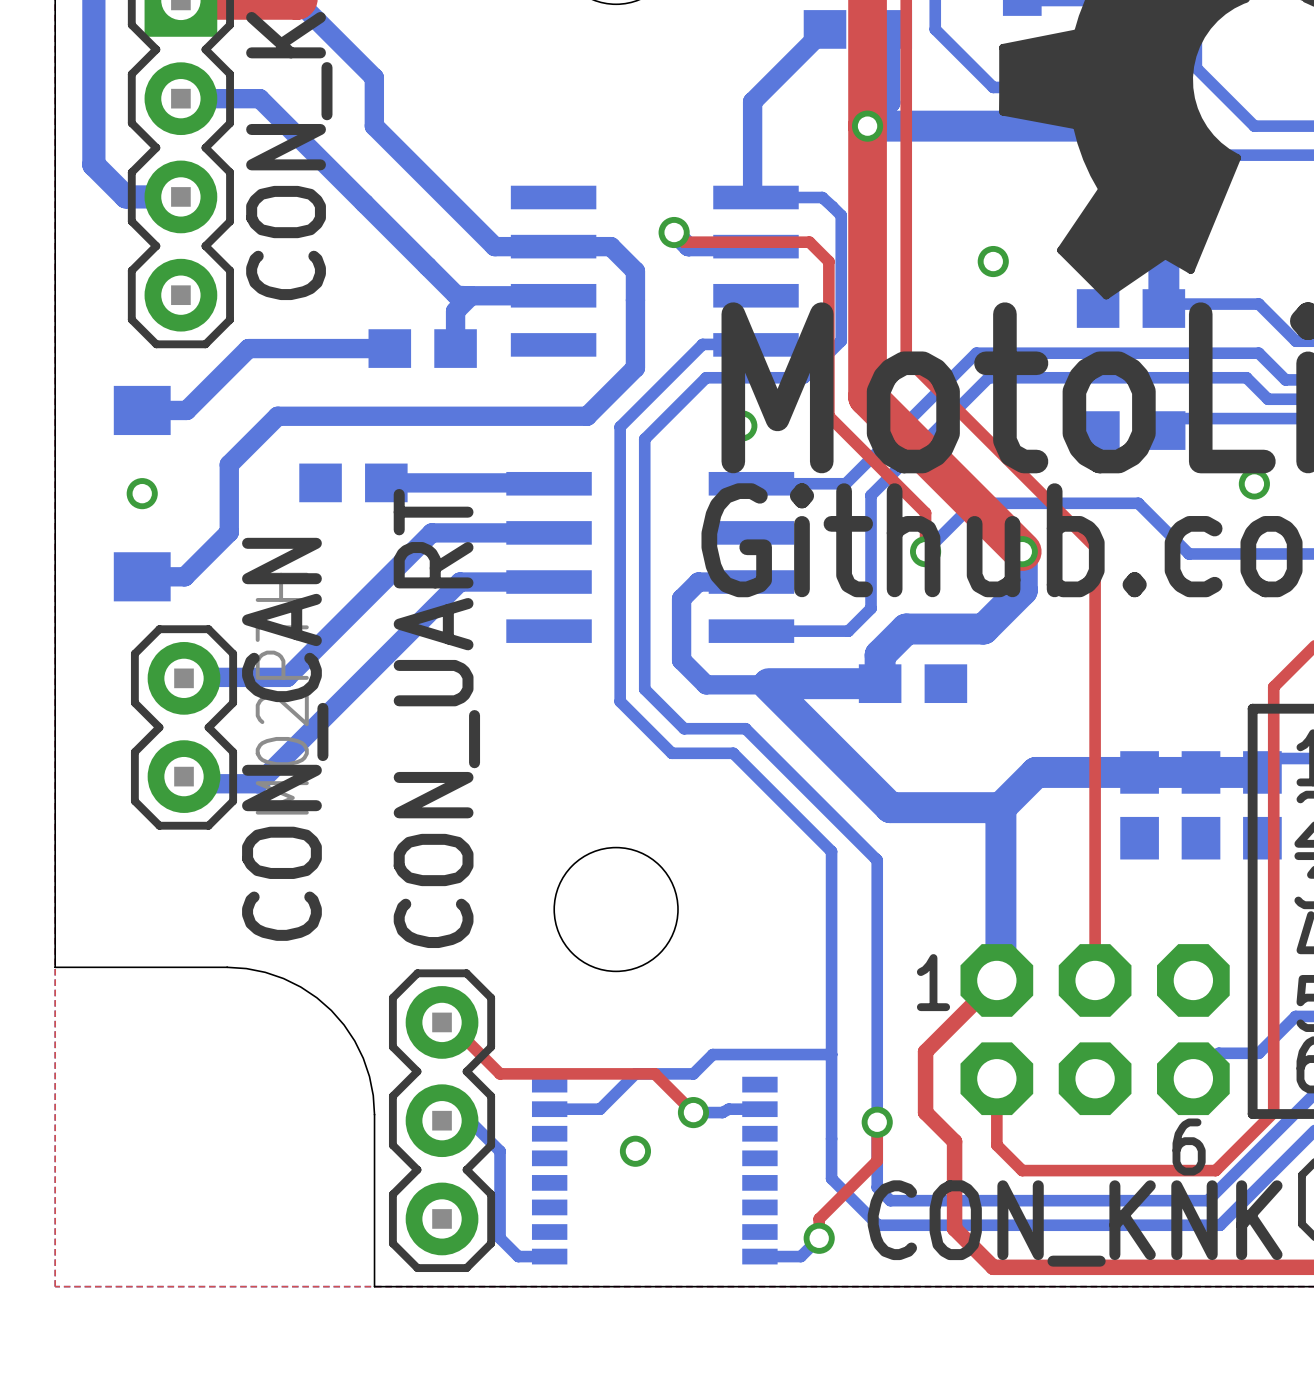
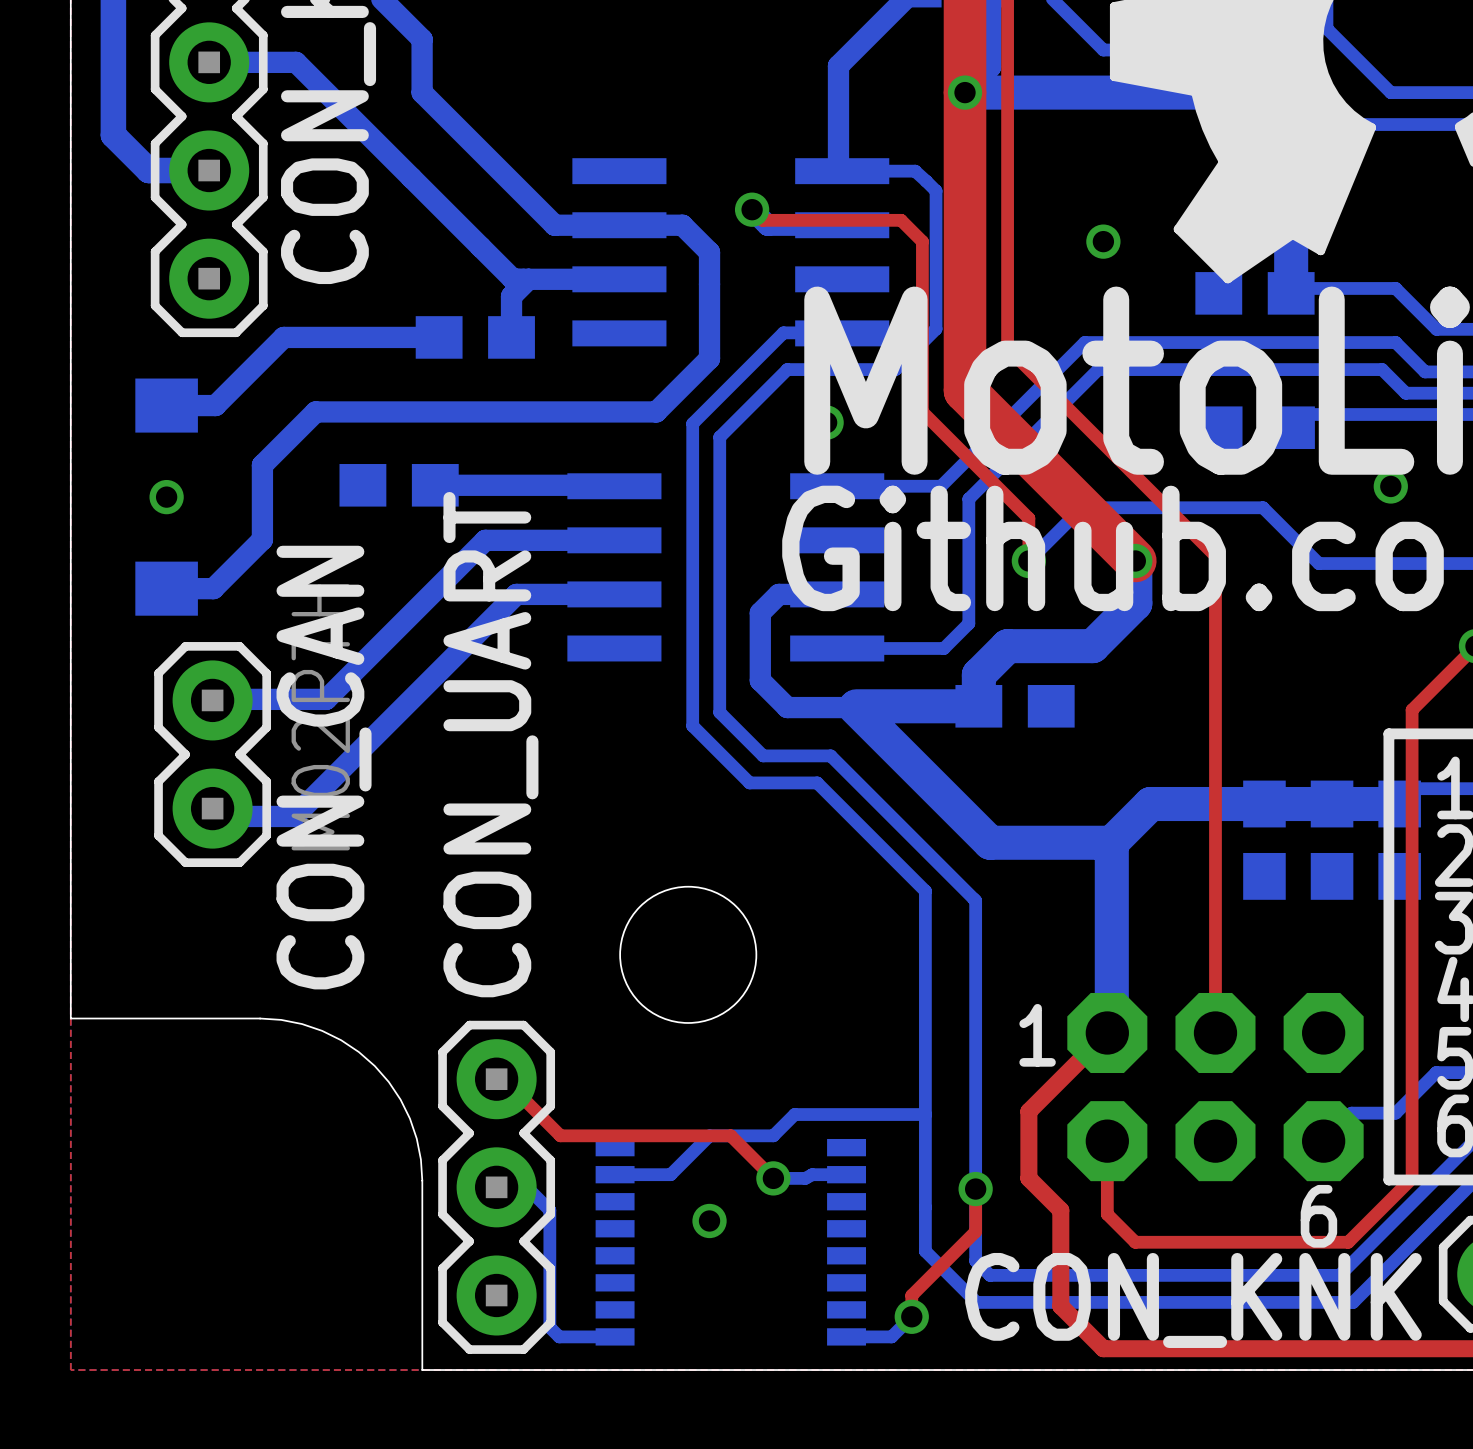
bottom track: (490, 1141) (500, 1151) (500, 1238) (518, 1256) -> (549, 1210) (549, 1327) (559, 1336) (580, 1336)

